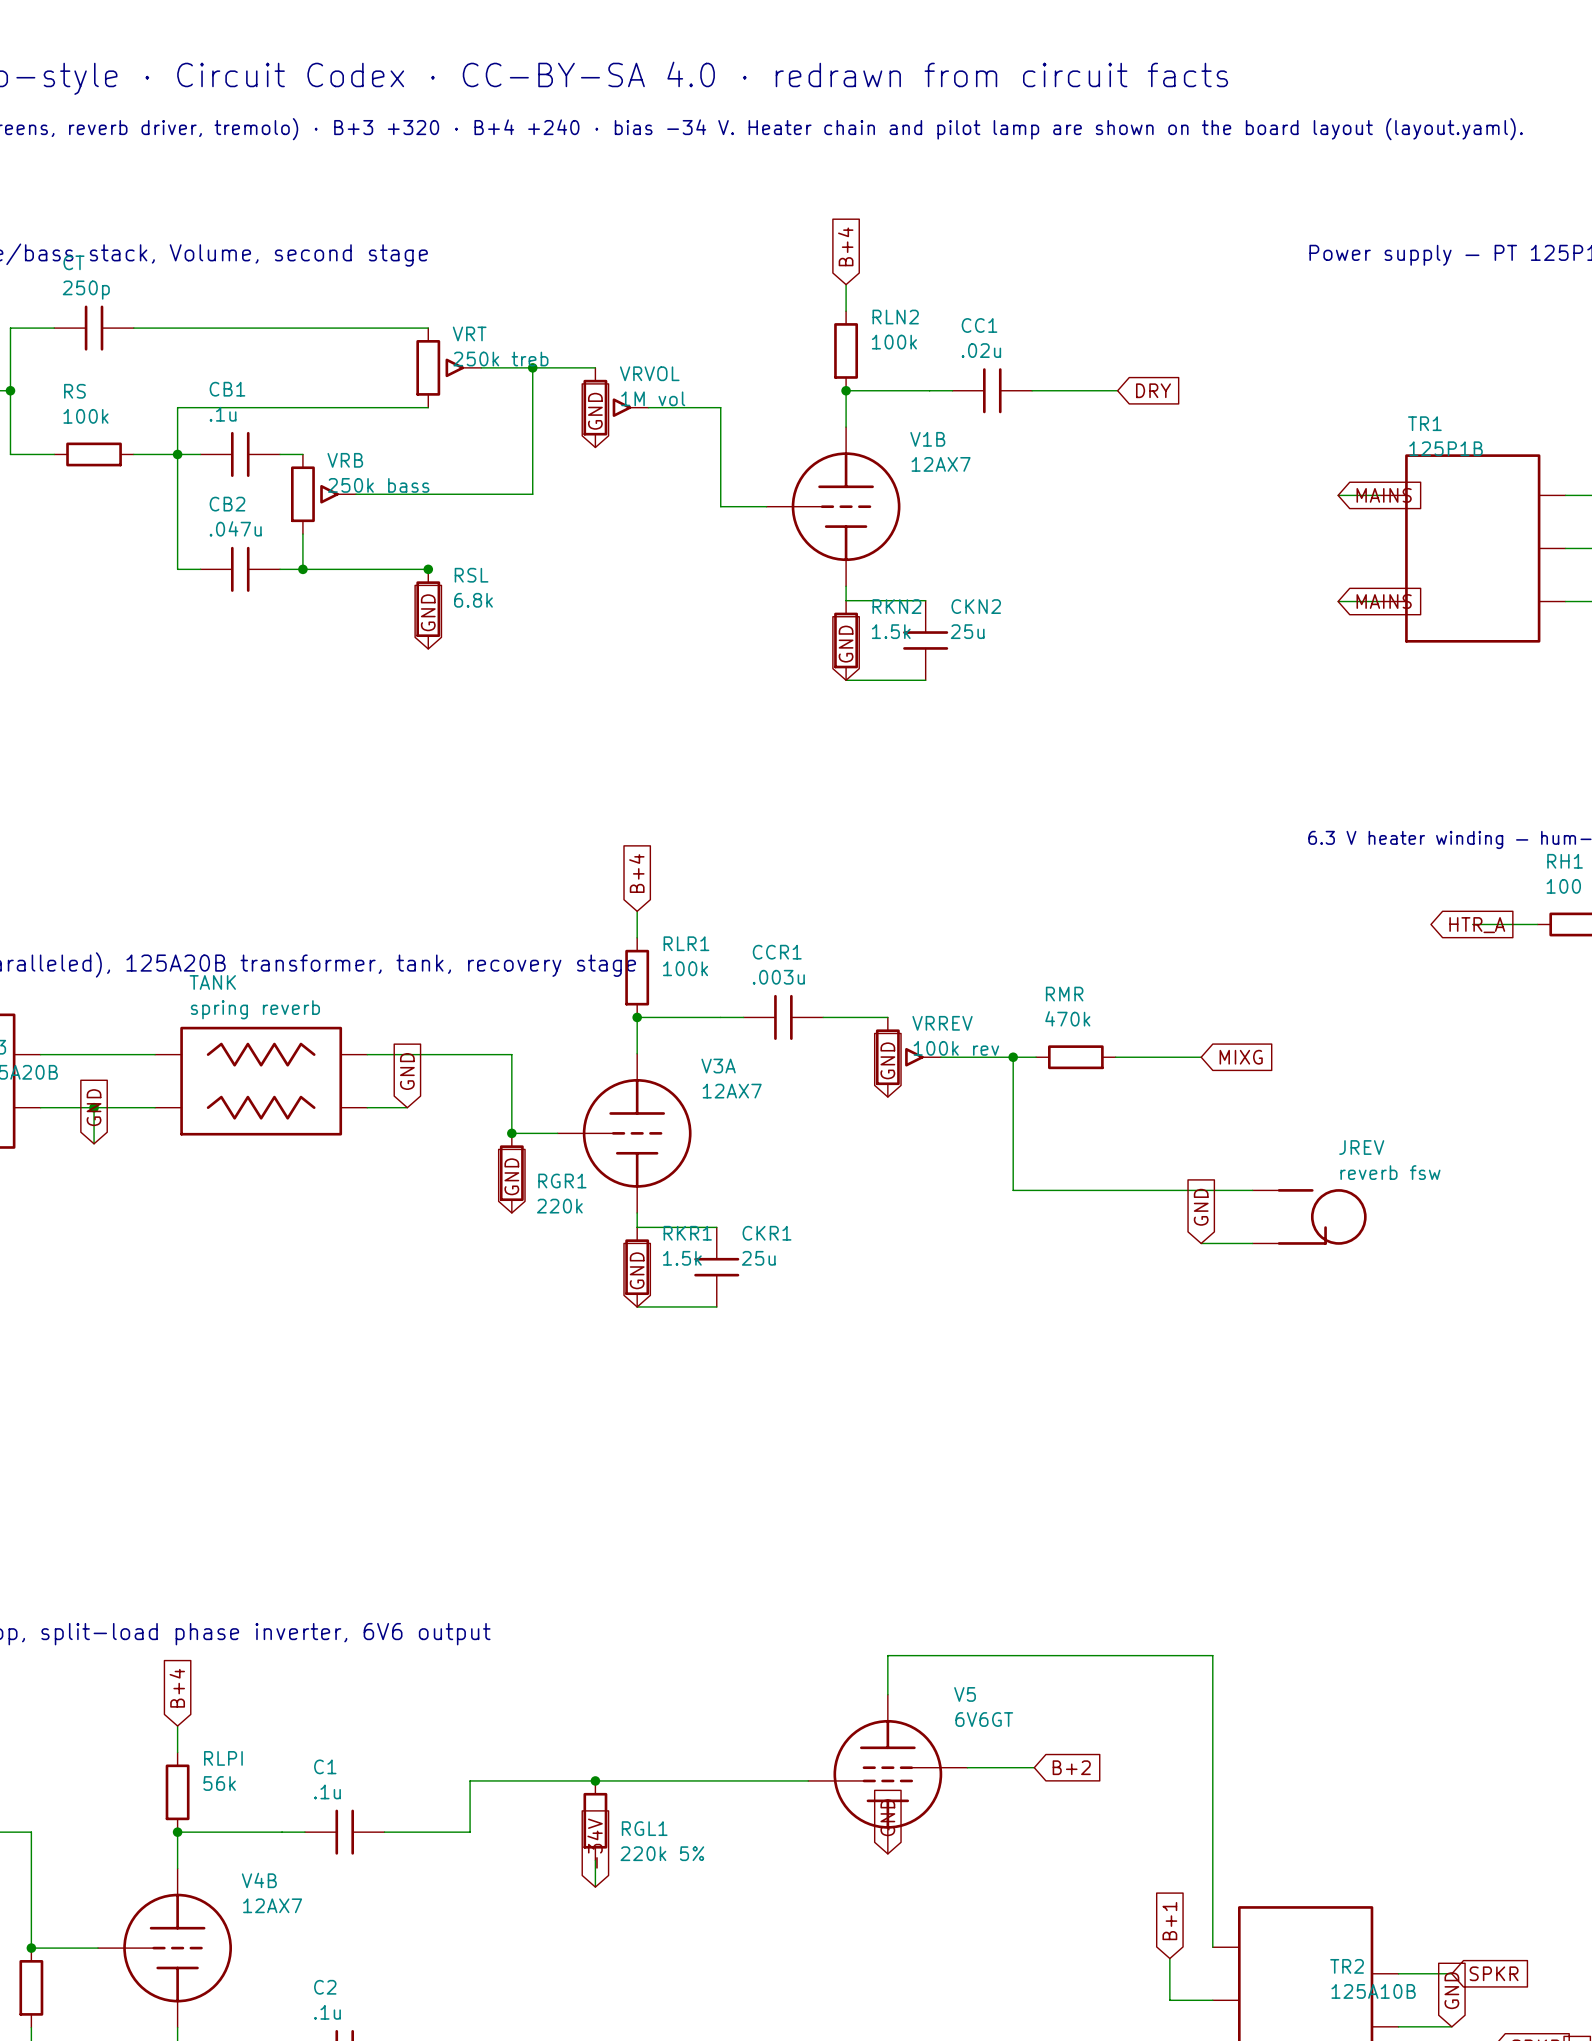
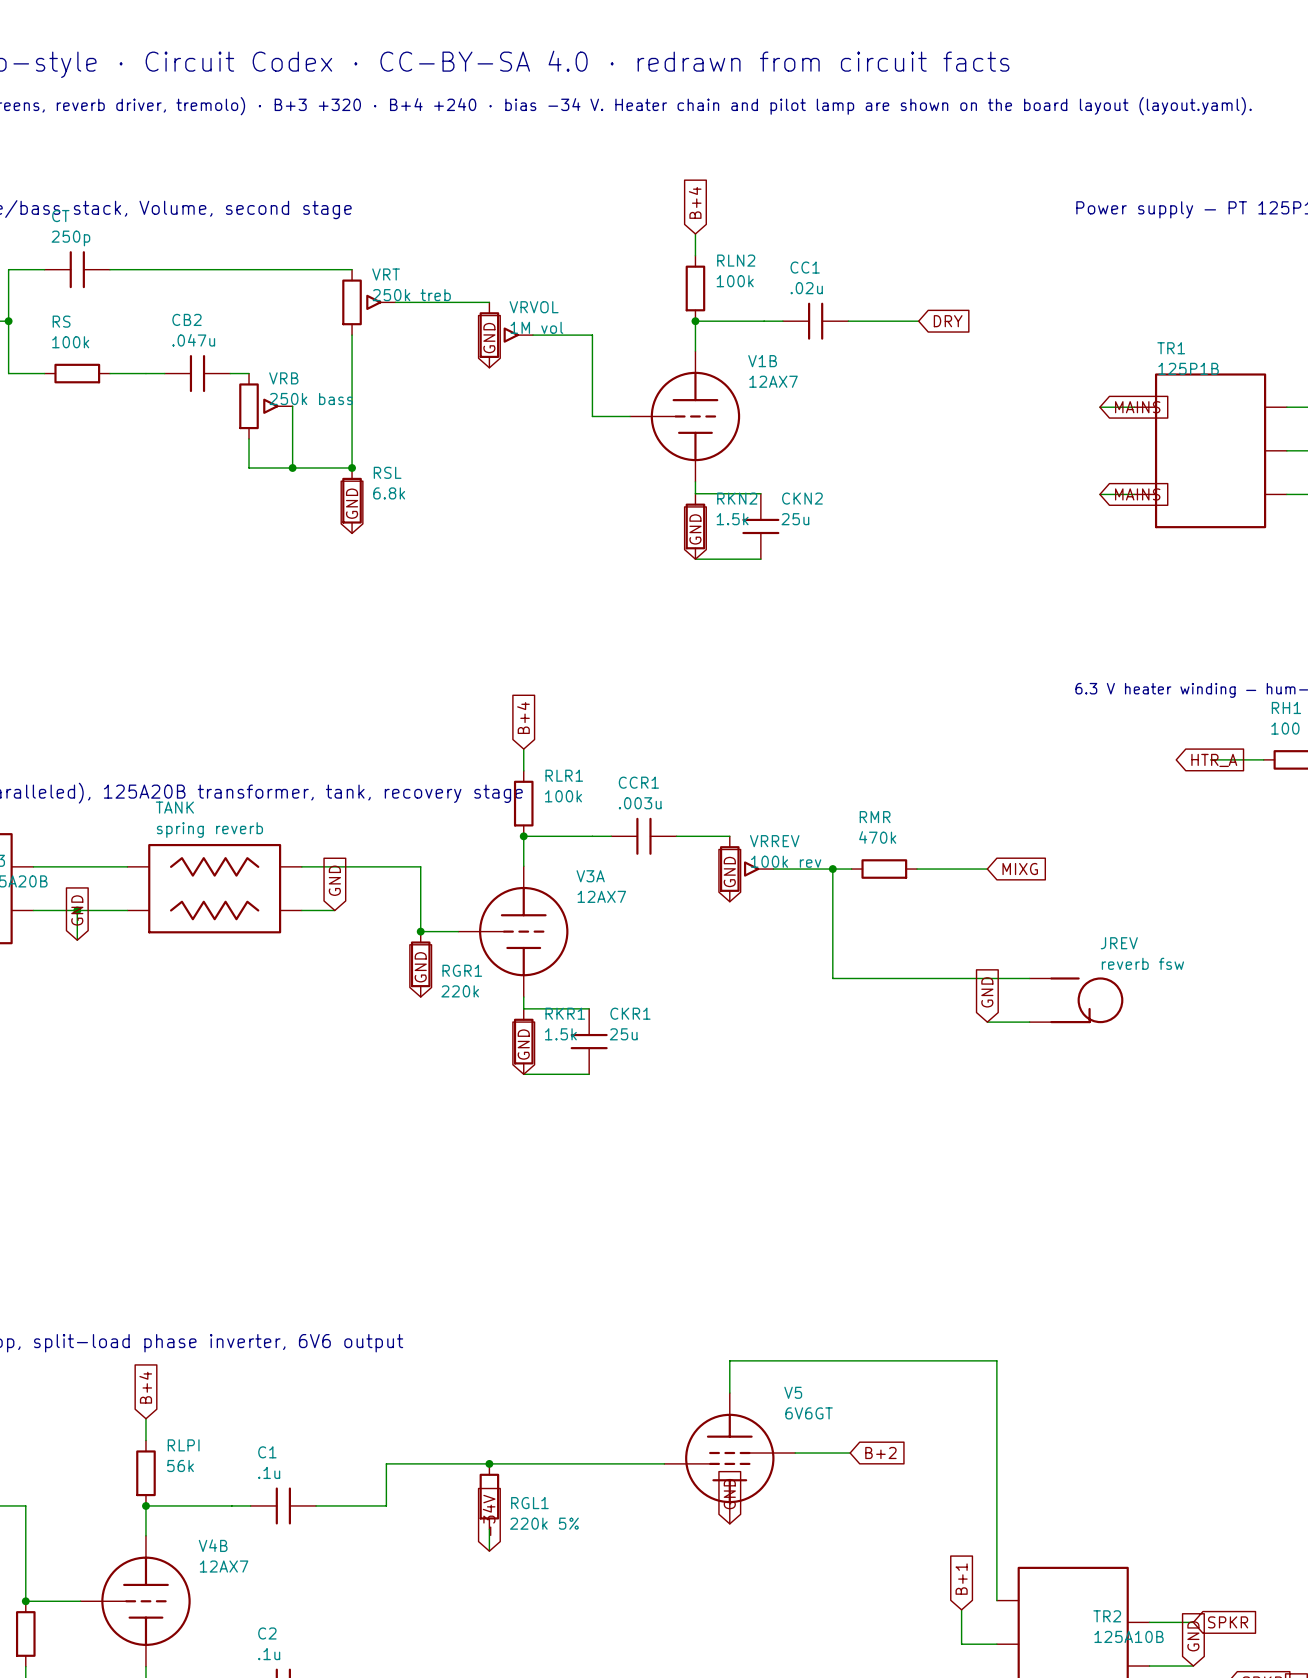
wire: (532, 367) (532, 494) (356, 494) -> (292, 467) (292, 406)
junction: (532, 367) -> none
CB1 name: CB1 (227, 389) -> CB2 (186, 319)
wire: (428, 407) (177, 407) (177, 569) (200, 569) -> (352, 335) (352, 467)
CB1 value: .1u (223, 414) -> .047u (193, 340)
junction: (177, 454) -> none
CB2: .047u (240, 569) -> none
wire: (280, 569) (302, 569) -> none
junction position: (302, 569) -> (292, 467)

